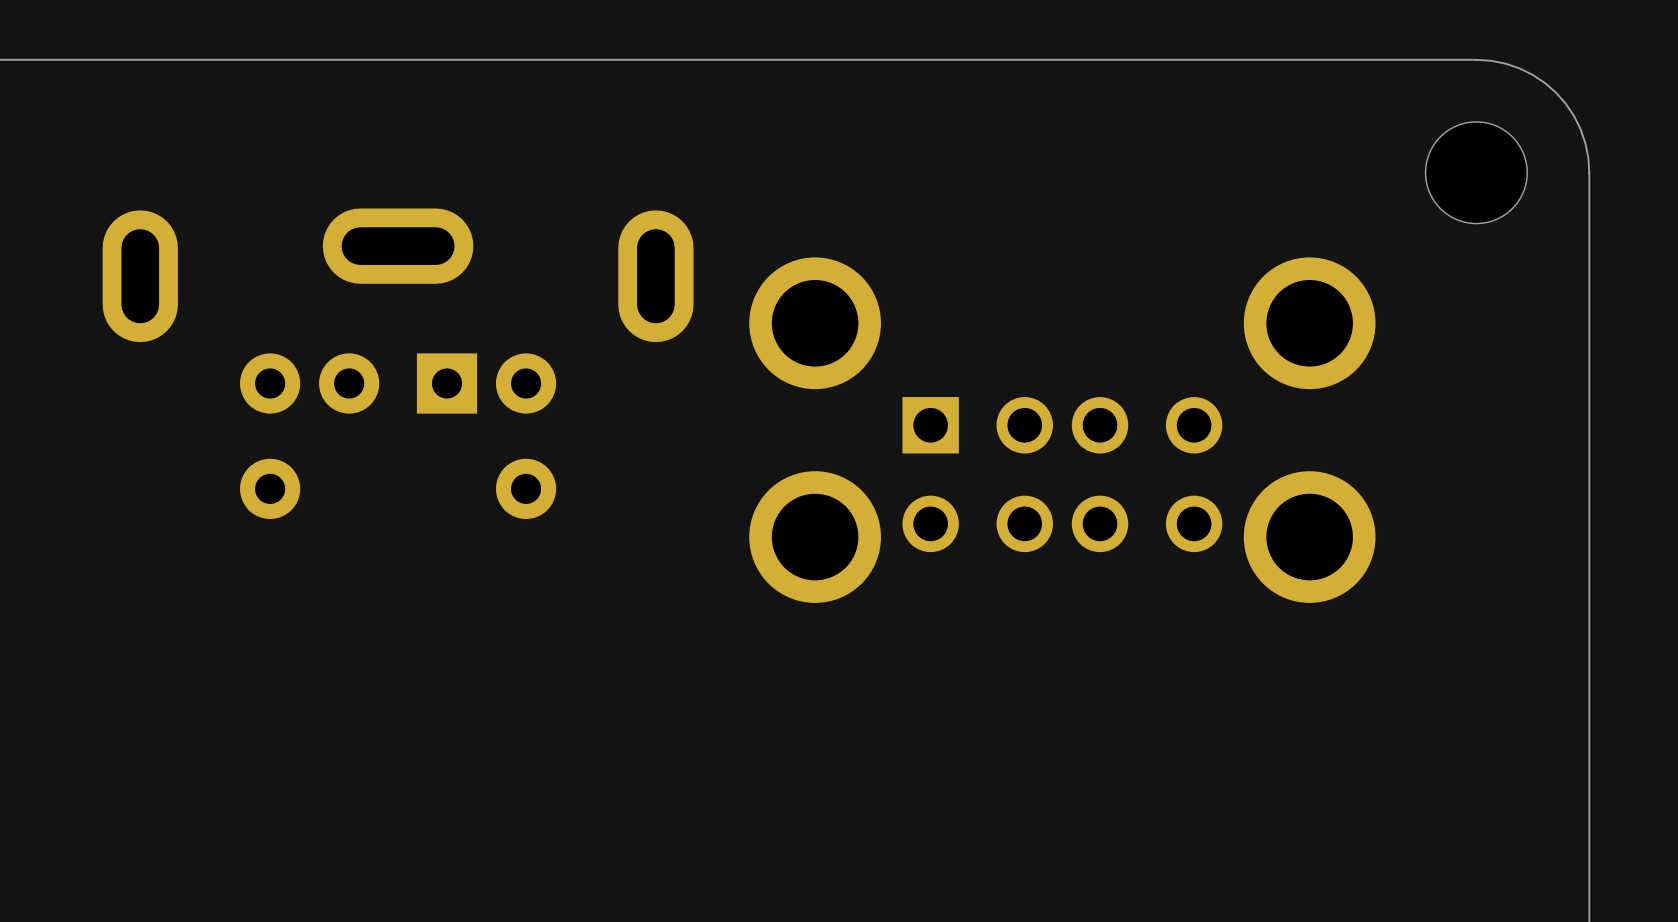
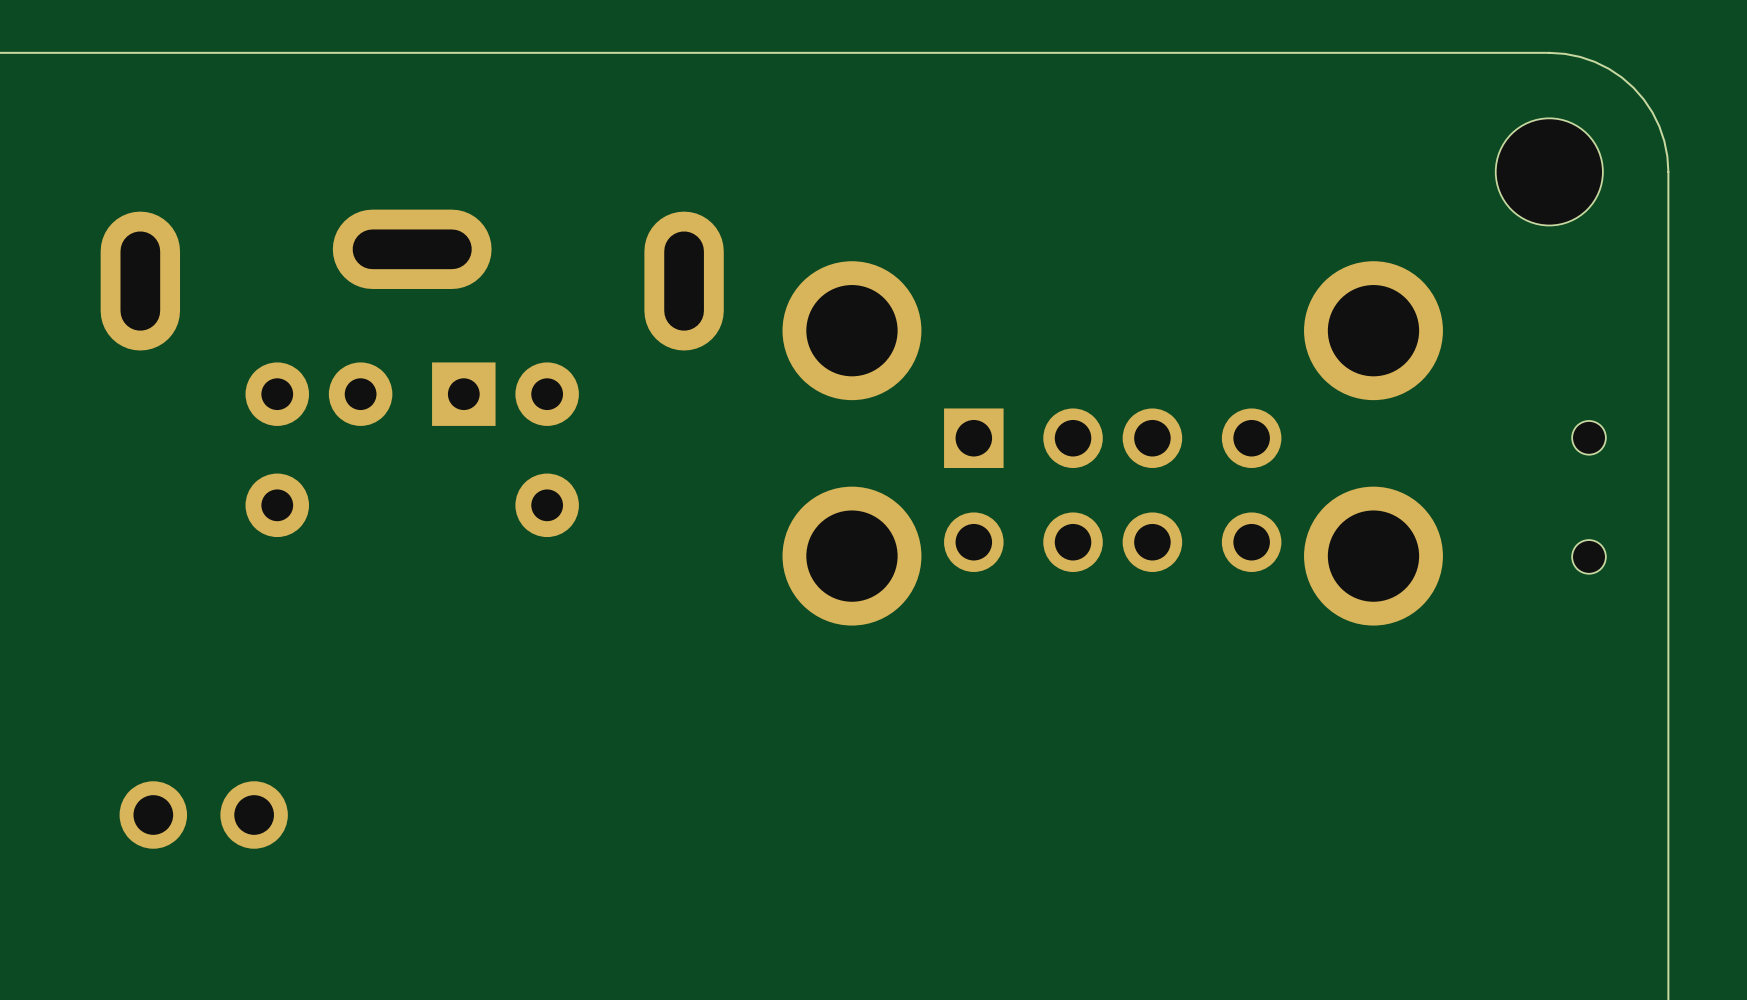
part: none -> (1589, 497)
part: none -> (203, 815)

